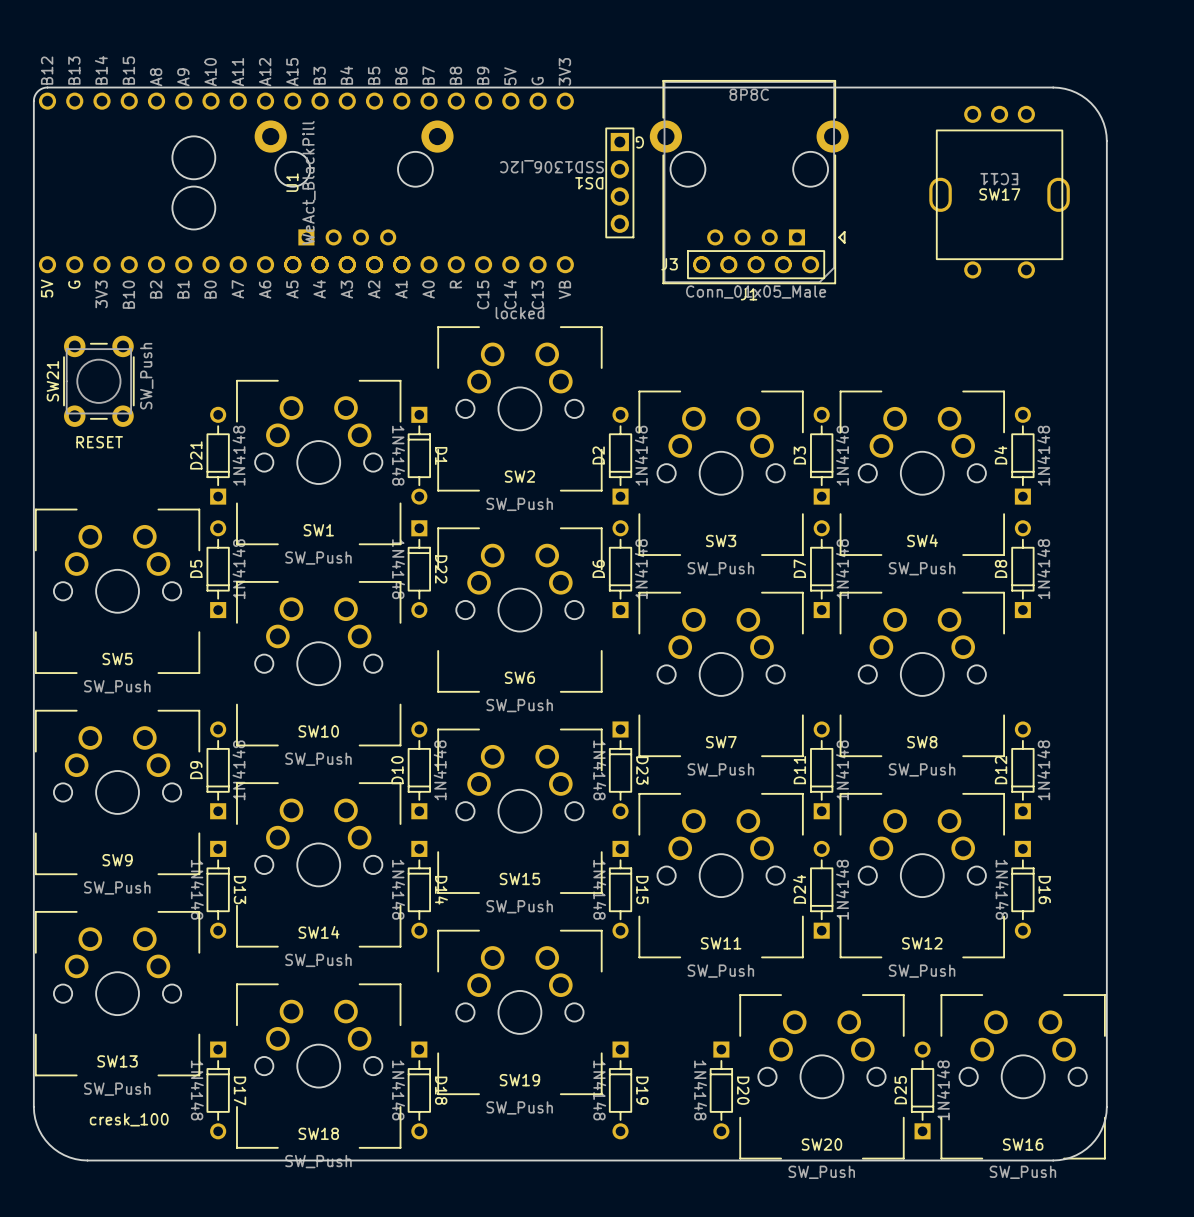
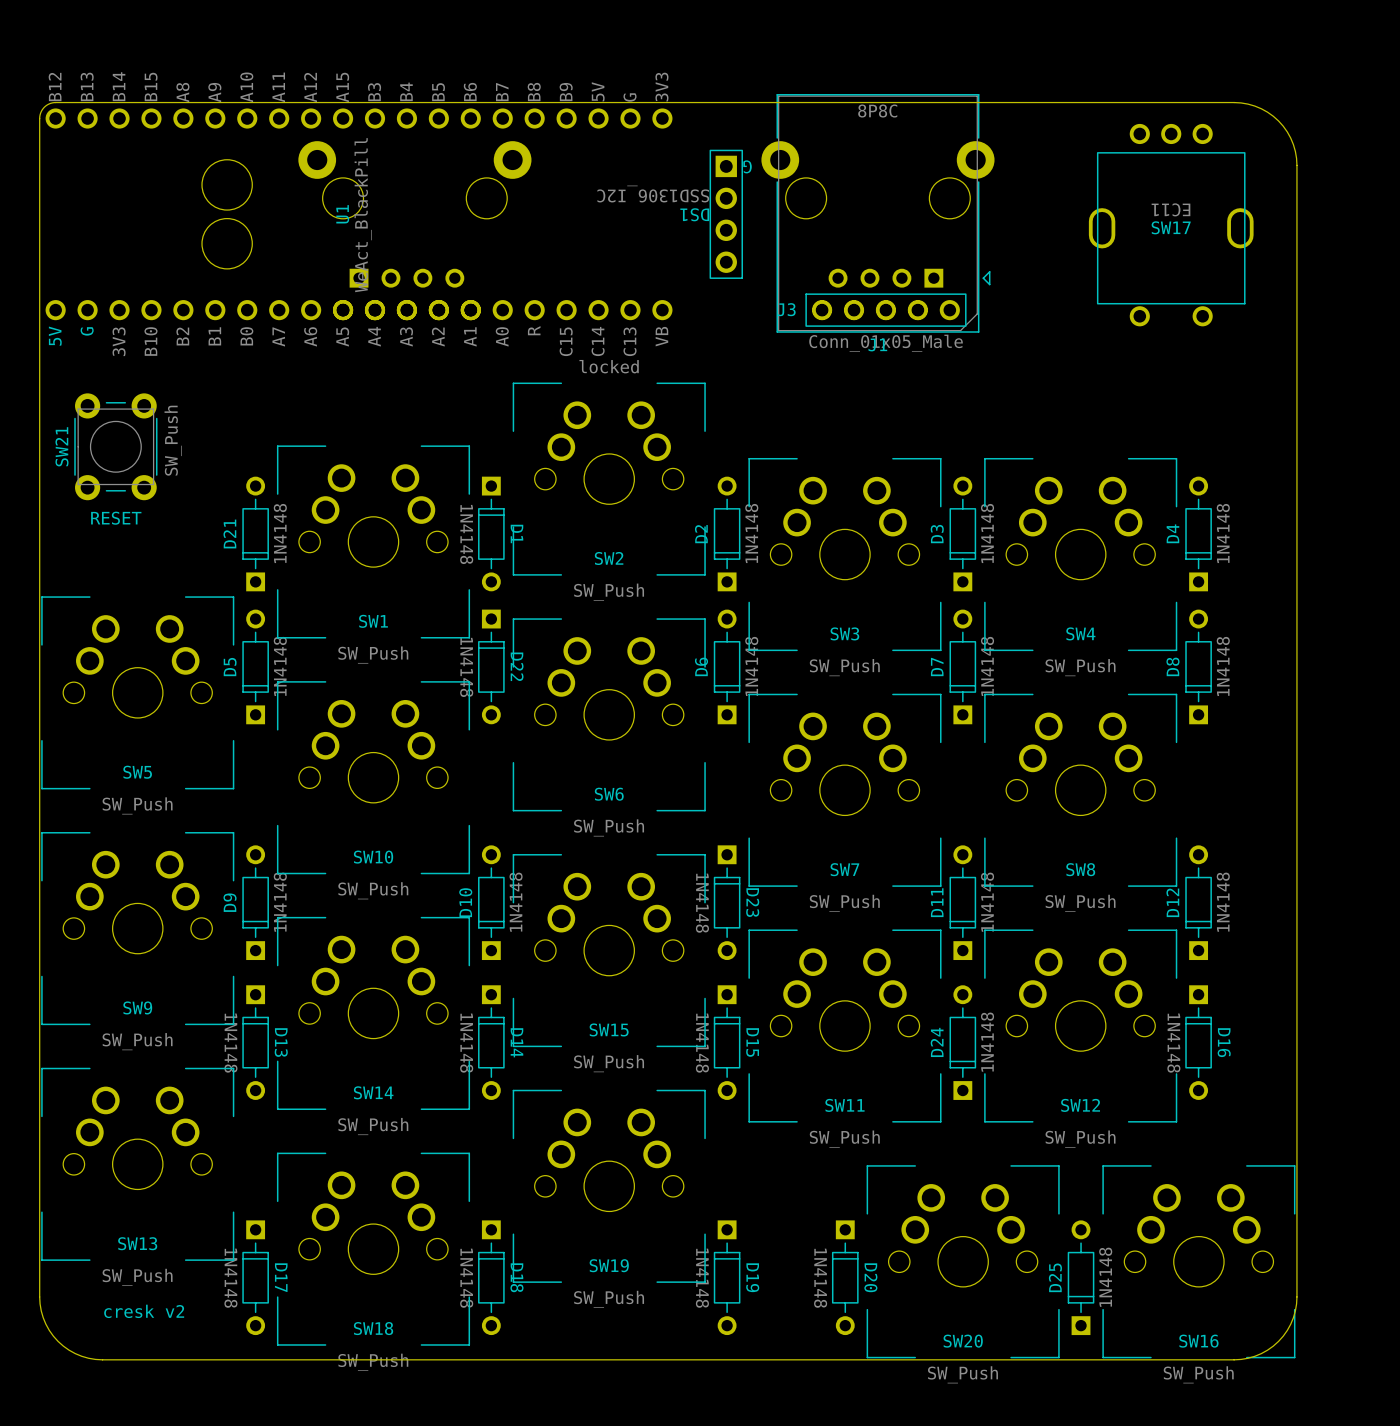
text: cresk_100 (129, 1119) -> cresk v2 (144, 1311)

